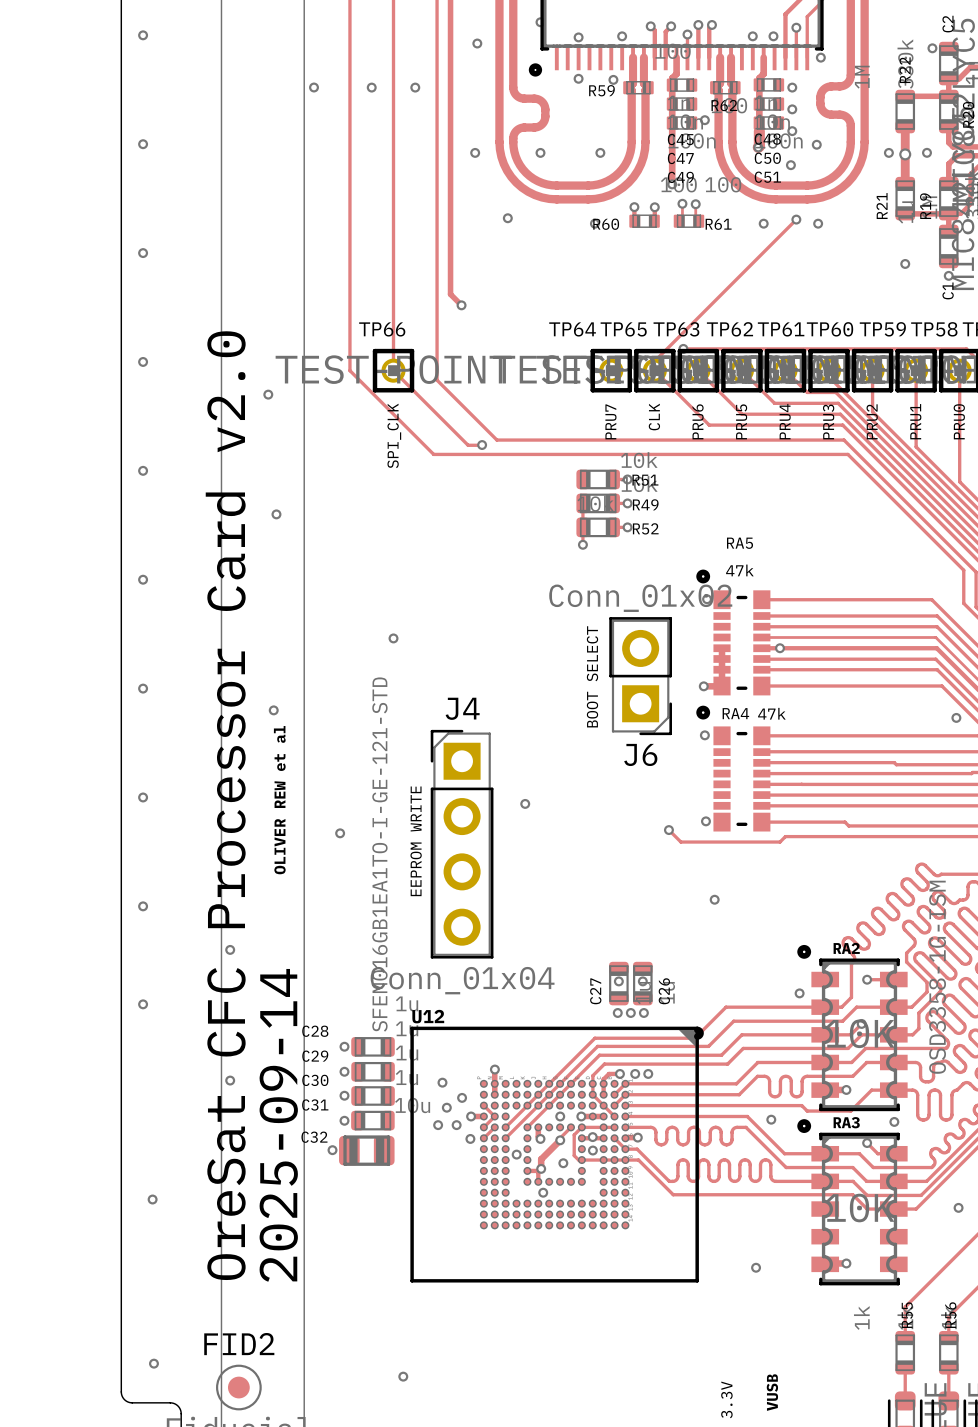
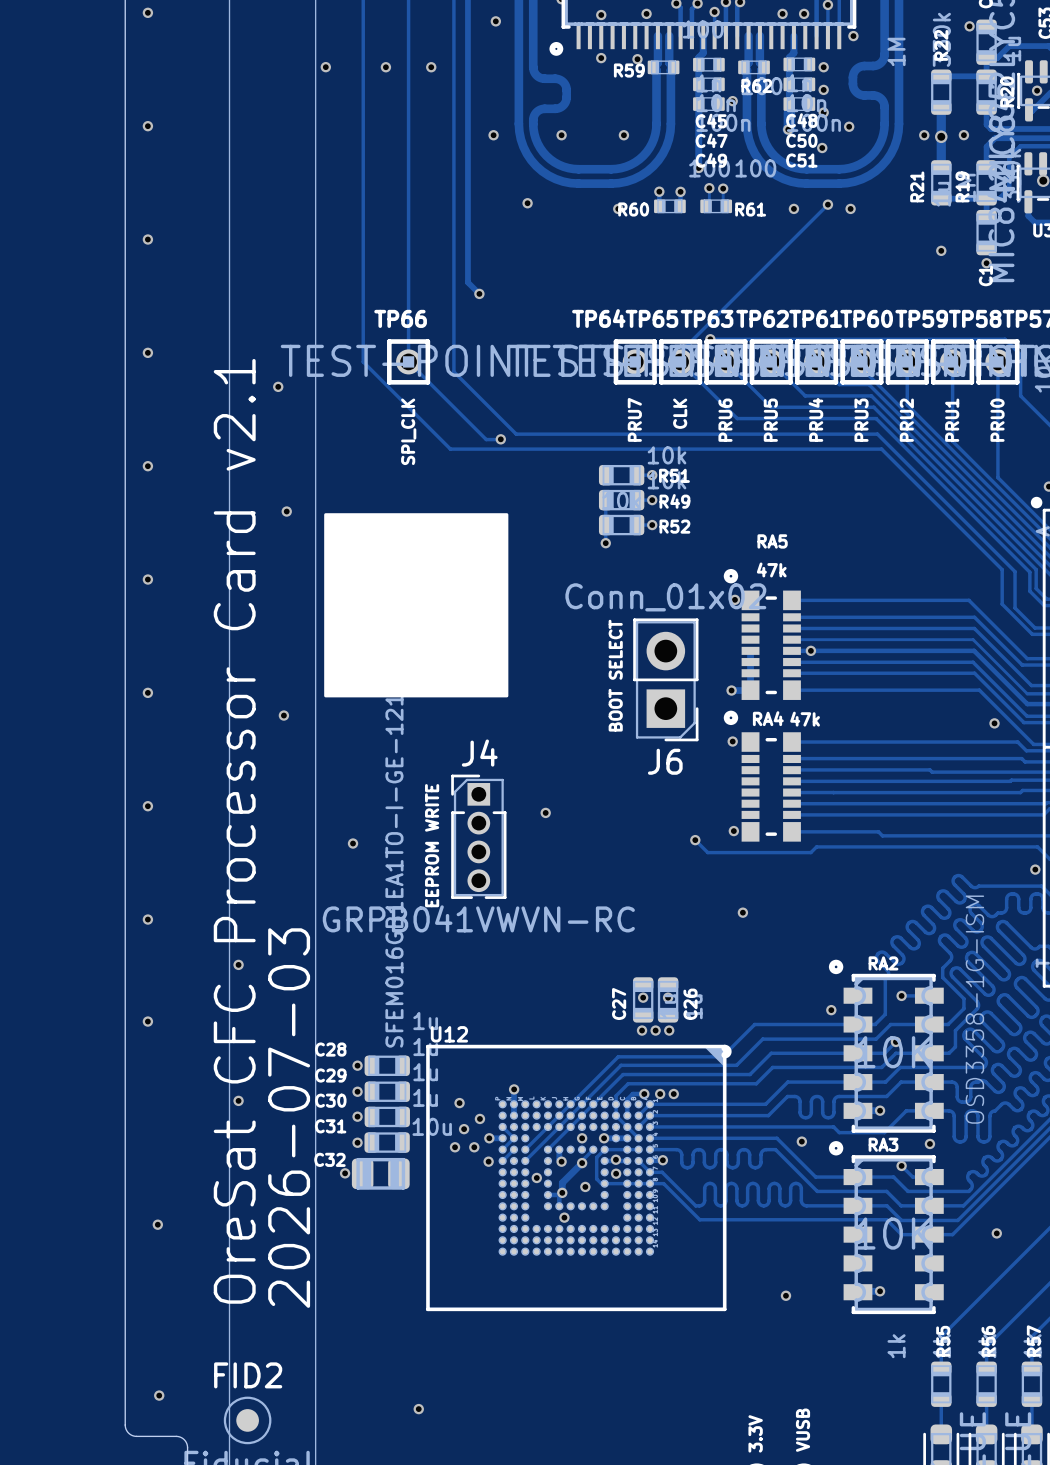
drawing: none -> [324, 513, 509, 698]
J4 name position: J4 (462, 708) -> J4 (479, 753)
J4 footprint: [430, 729, 494, 959] -> [451, 774, 507, 899]
text: OLIVER REW et al (279, 800) -> none
text: OreSat CFC Processor Card v2.0 (225, 805) -> OreSat CFC Processor Card v2.1 (234, 831)
J4 value: Conn_01x04 (462, 980) -> GRPB041VWVN-RC (478, 918)
text: 2025-09-14 (278, 1125) -> 2026-07-03 (289, 1118)

